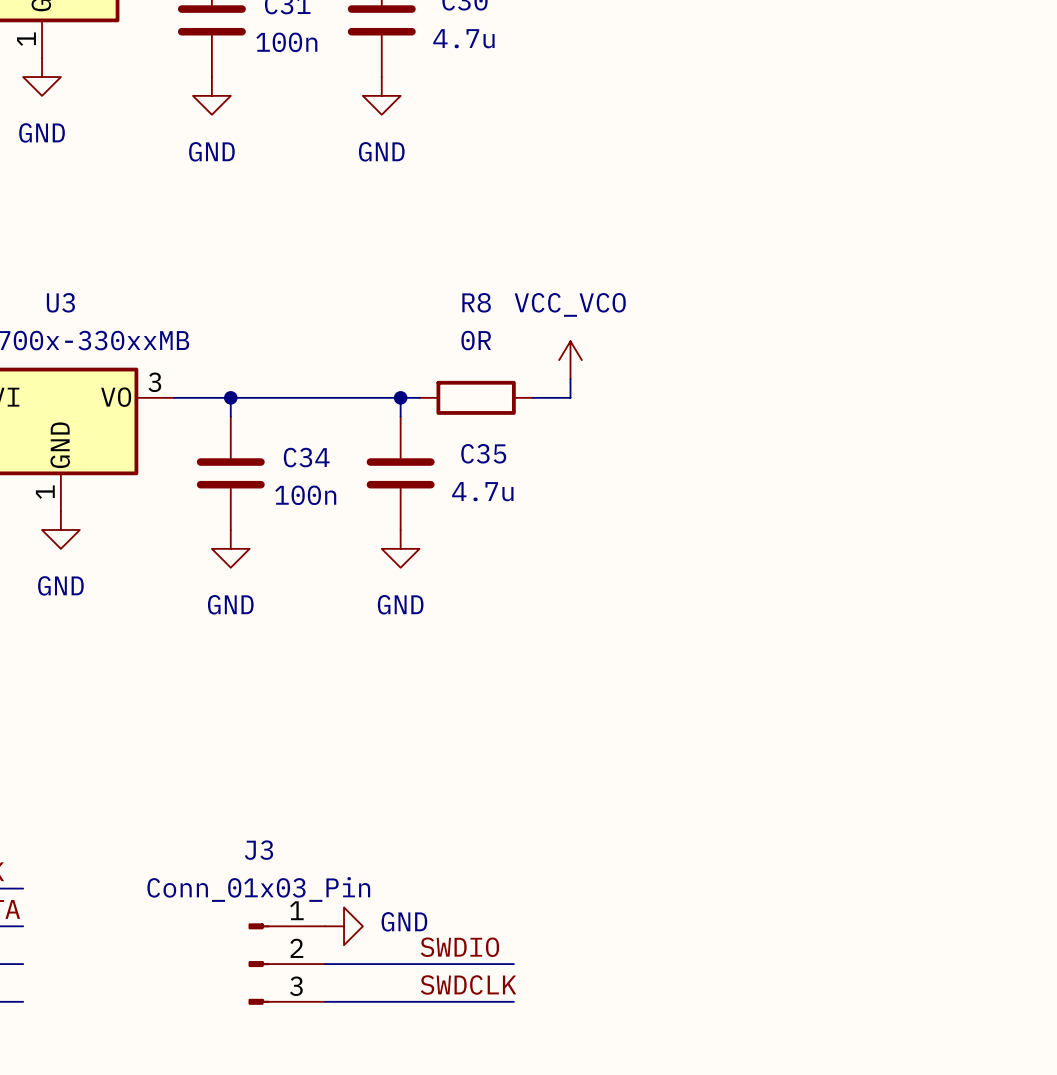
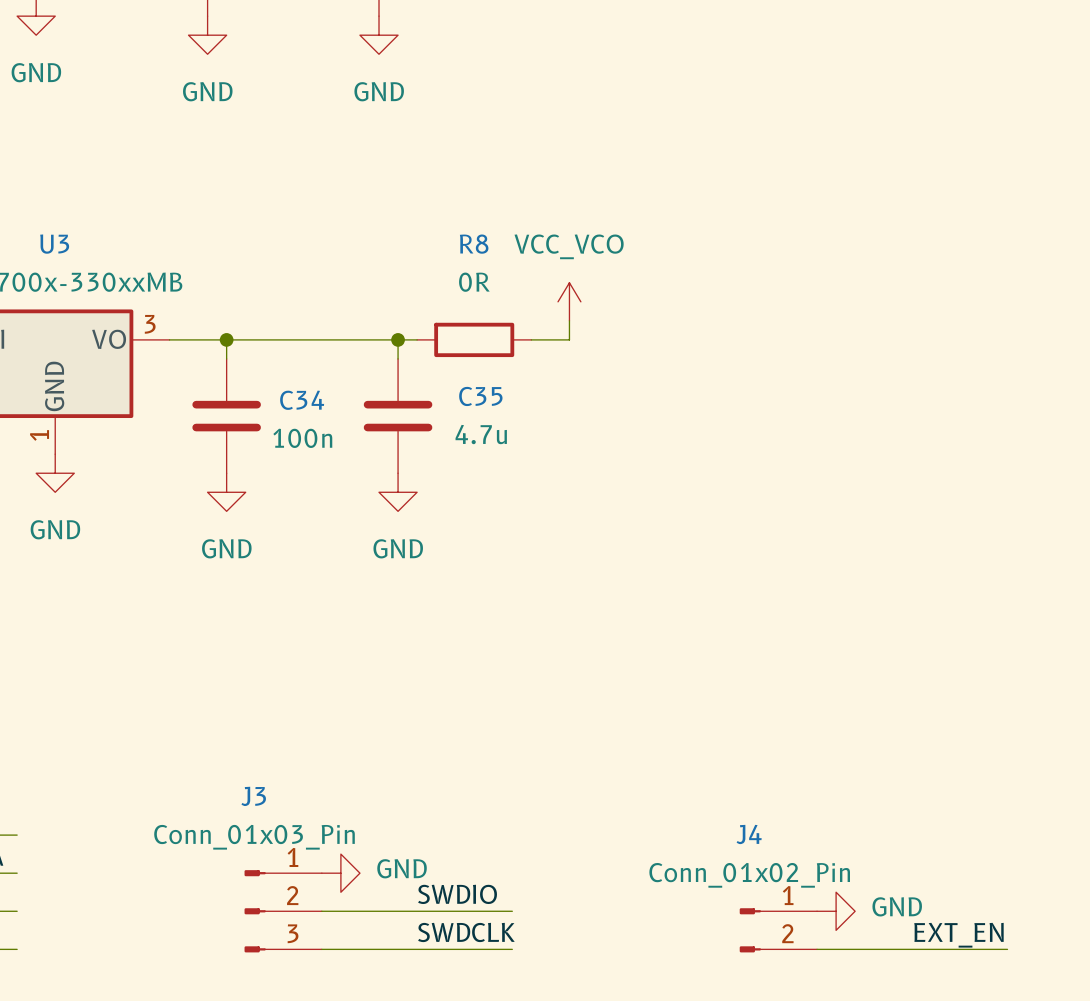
power symbol: none -> GND (836, 911)
J4: none -> Conn_01x02_Pin (778, 930)
label: none -> EXT_EN (958, 935)
wire: none -> (817, 949) (1007, 949)

